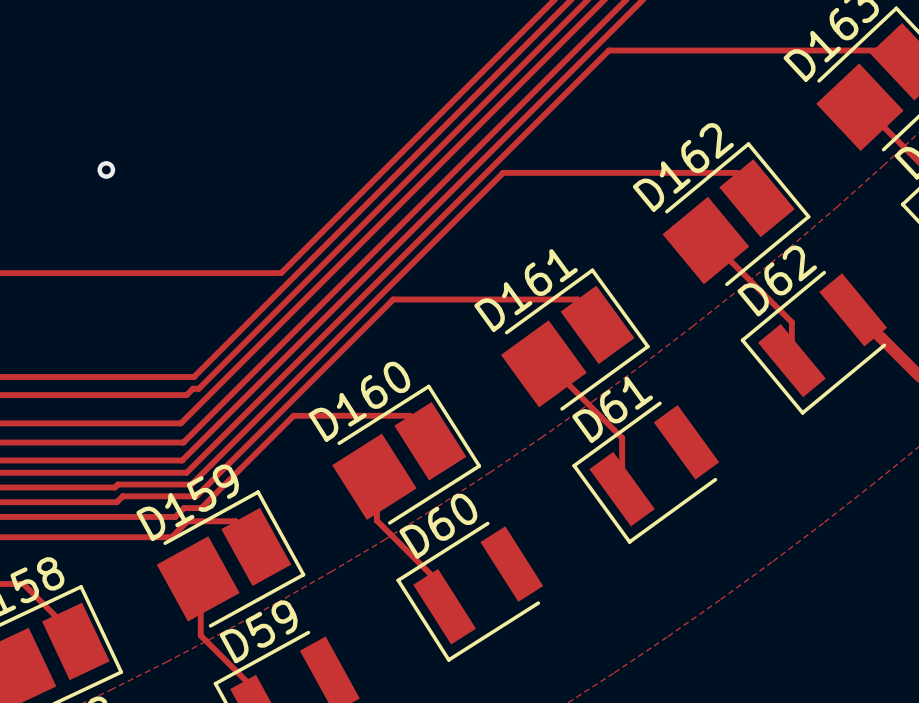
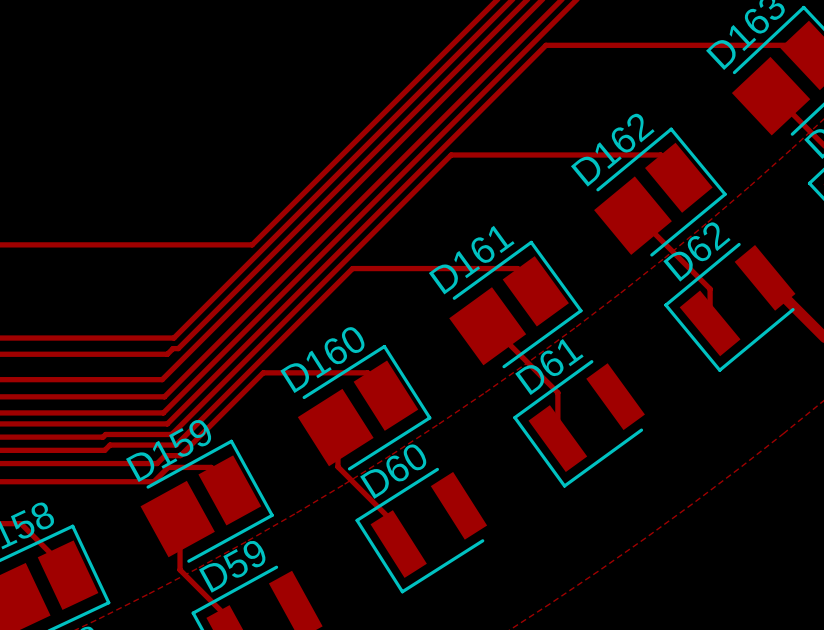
via: (106, 169) -> none

